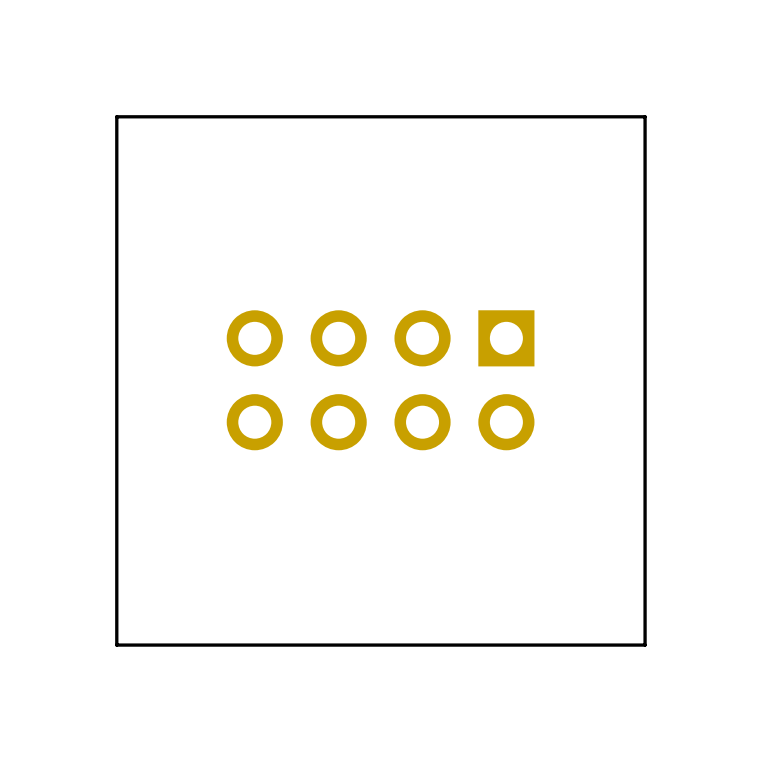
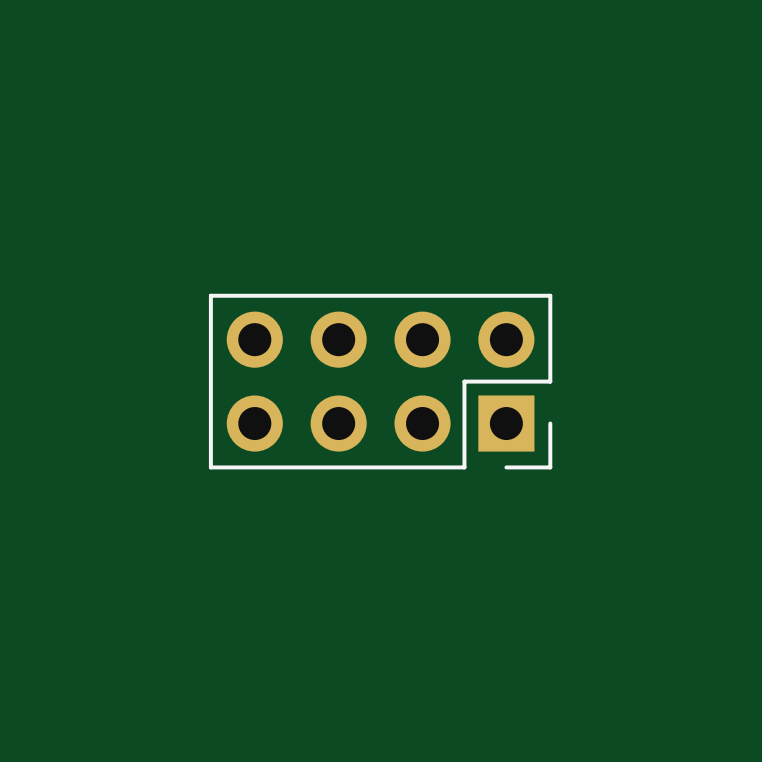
board edge: (645, 116) (116, 116) (116, 645) (645, 645) (645, 116) -> none
part side: top (380, 380) -> bottom (380, 381)

